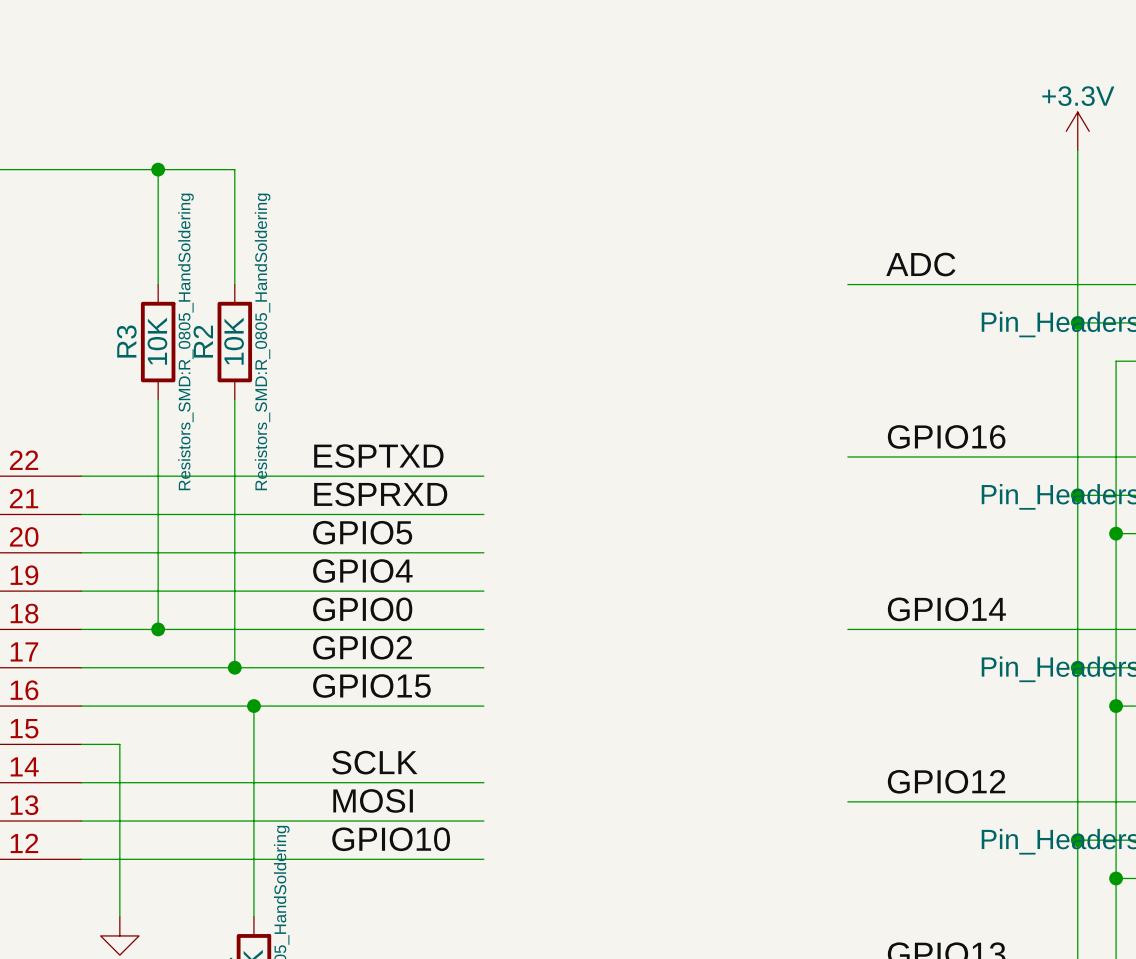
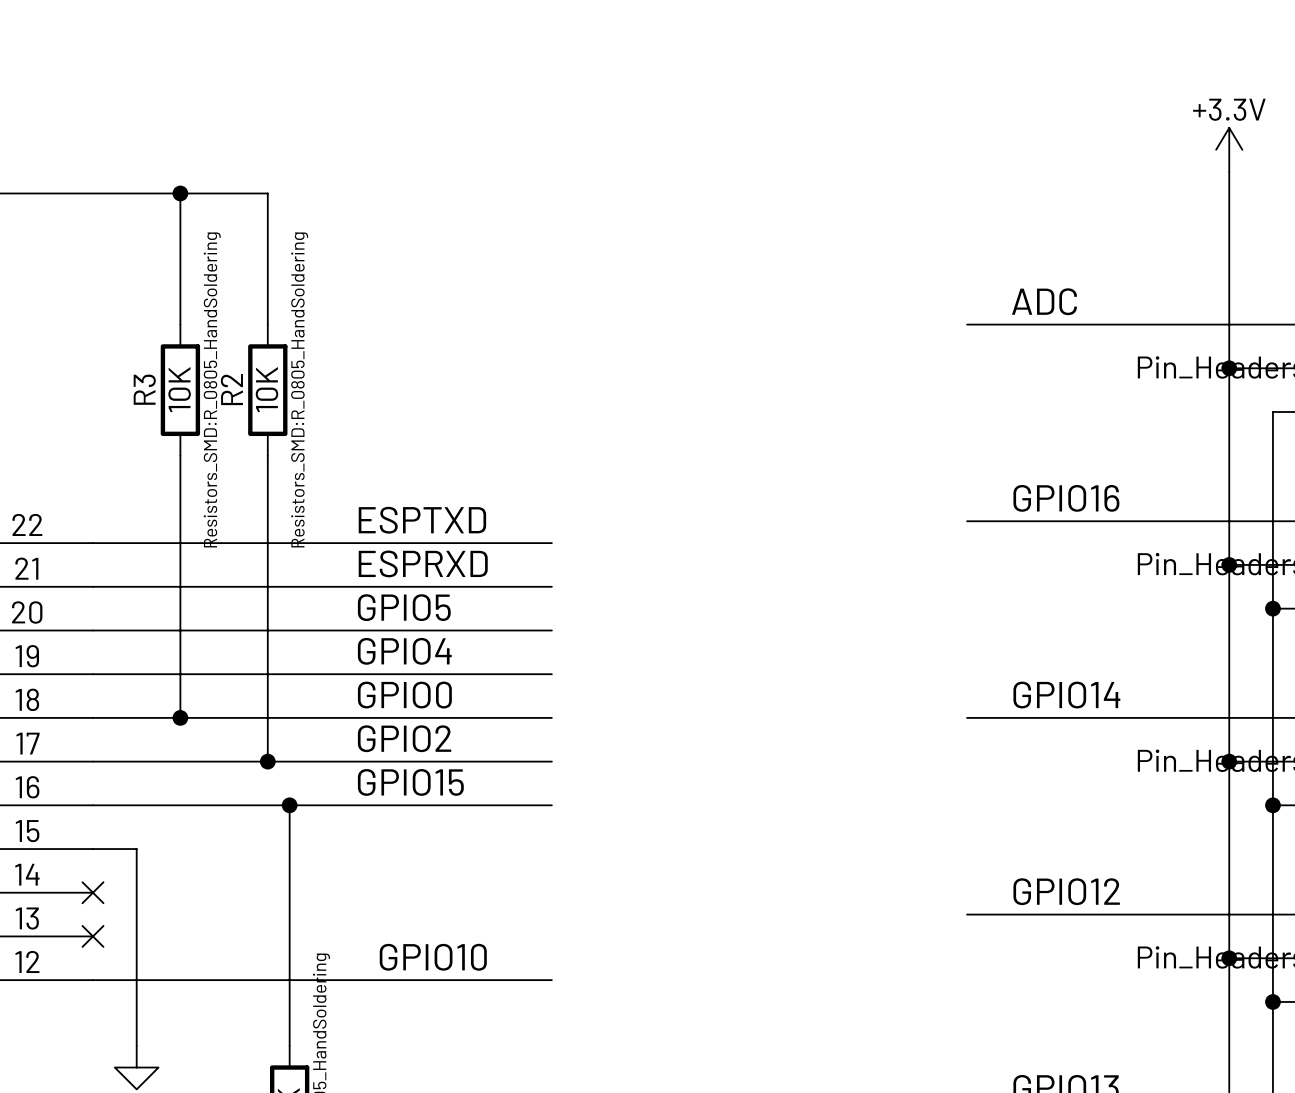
label: SCLK (374, 762) -> none
wire: (81, 782) (483, 782) -> none
no-connect mark: none -> (92, 892)
label: MOSI (373, 800) -> none
wire: (81, 821) (483, 821) -> none
no-connect mark: none -> (92, 936)

